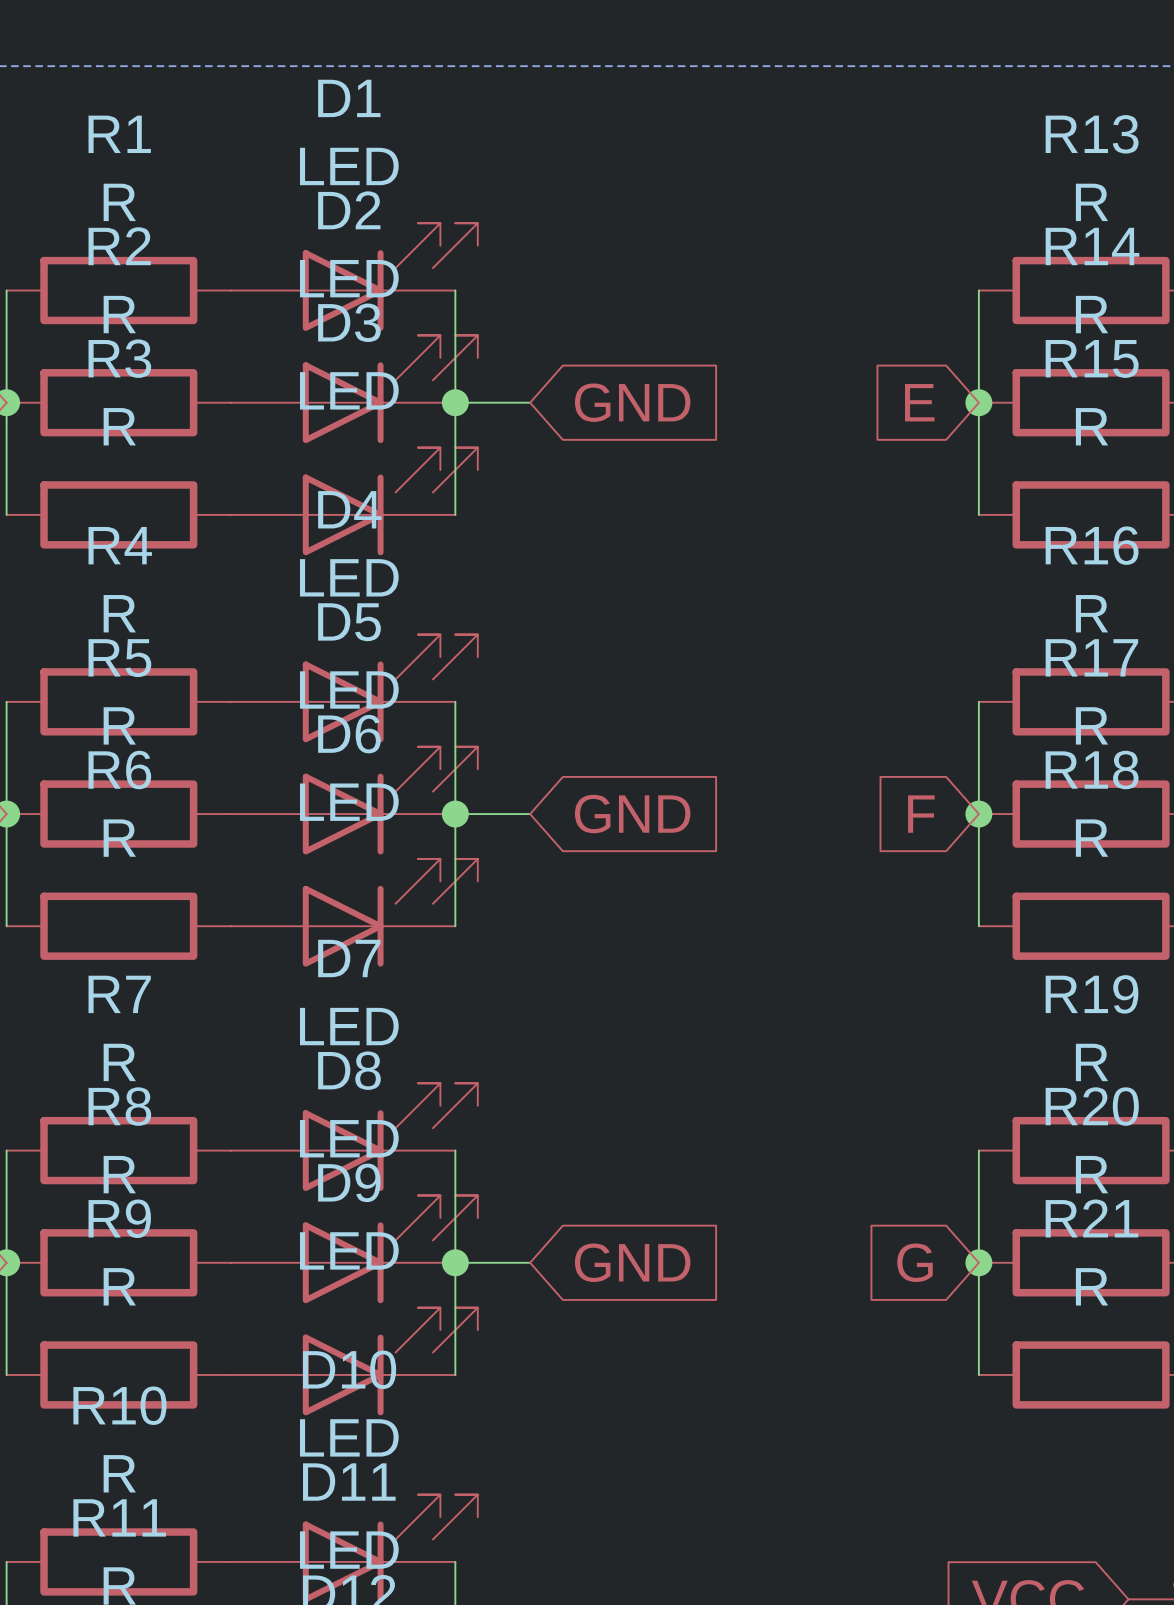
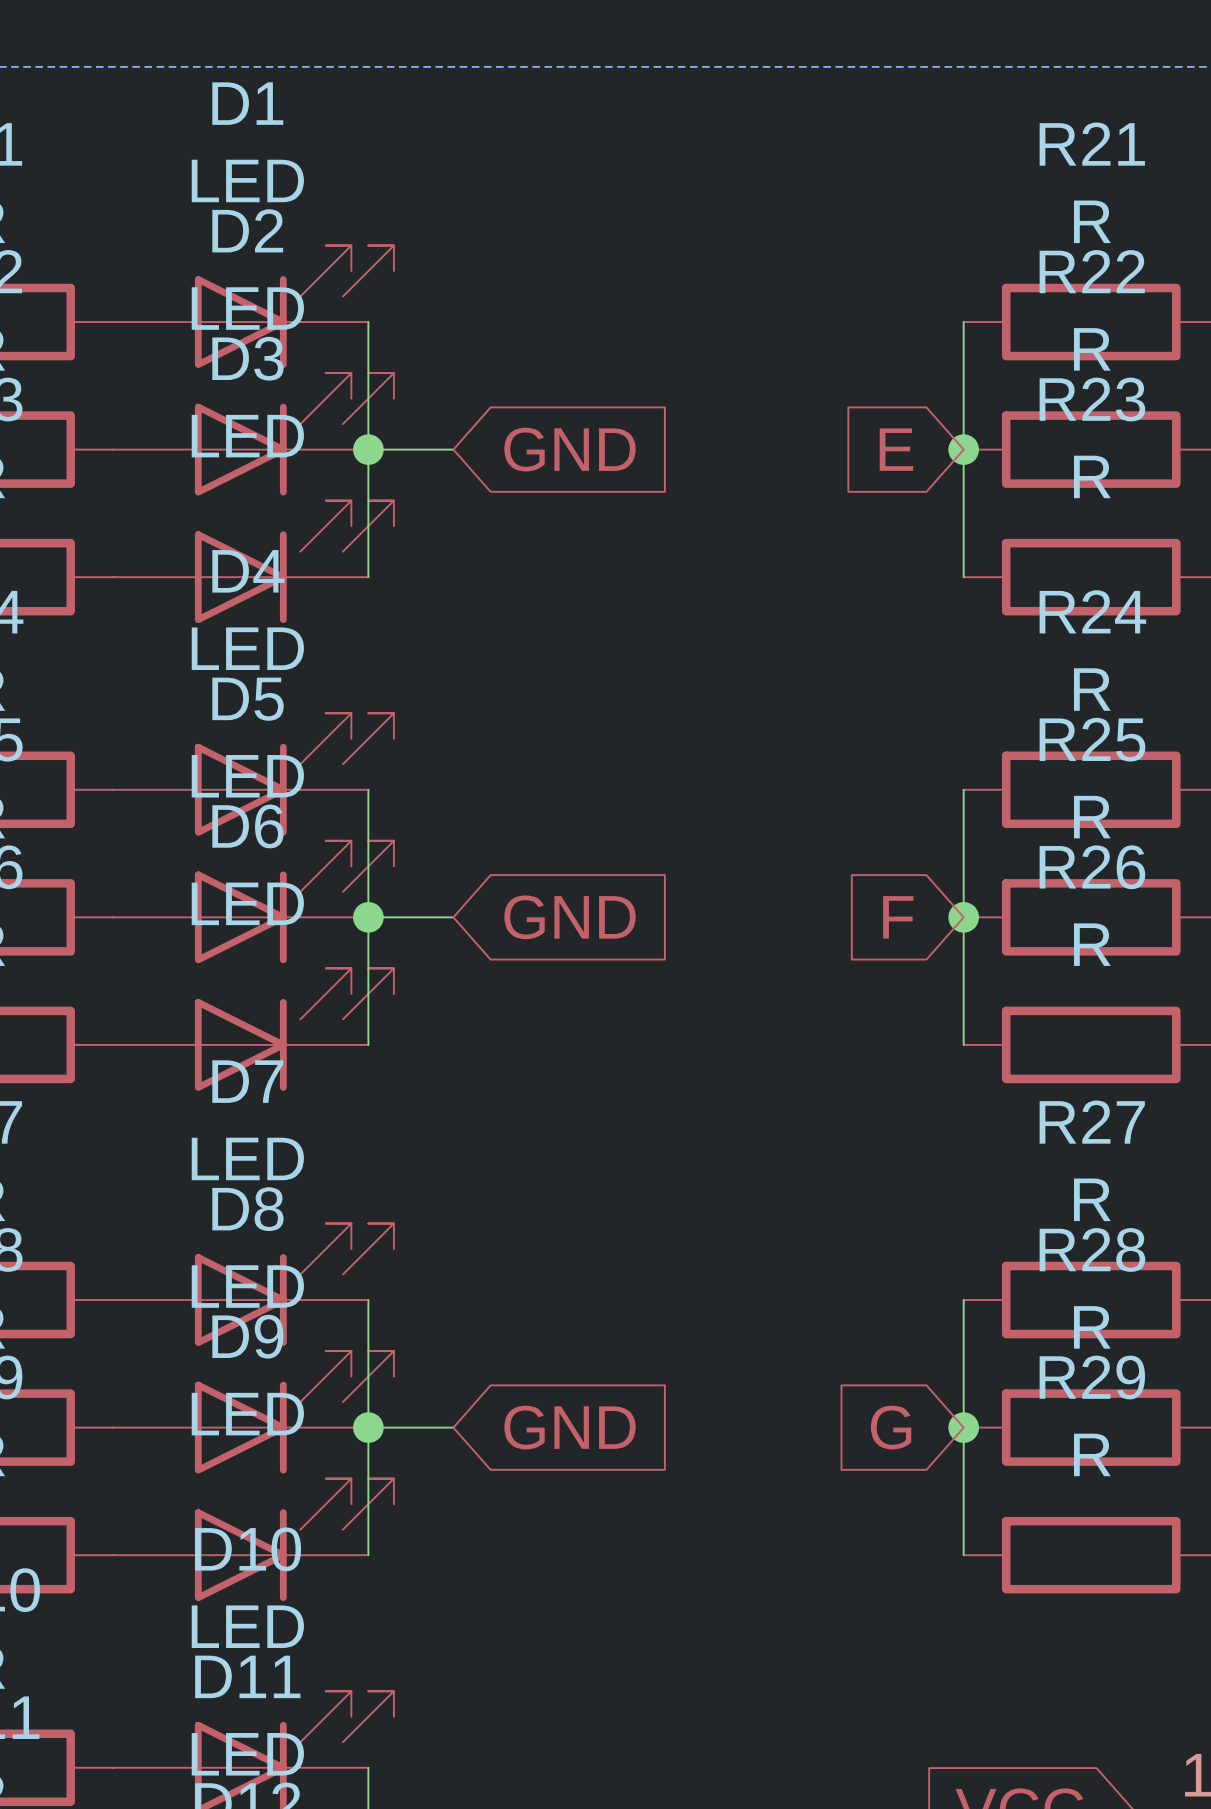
R13 name: R13 (1092, 134) -> R21 (1092, 144)
R14 name: R14 (1092, 246) -> R22 (1092, 271)
R15 name: R15 (1092, 358) -> R23 (1092, 399)
R16 name: R16 (1092, 545) -> R24 (1092, 611)
R17 name: R17 (1091, 657) -> R25 (1092, 739)
R18 name: R18 (1092, 770) -> R26 (1092, 867)
R19 name: R19 (1092, 994) -> R27 (1092, 1122)
R20 name: R20 (1092, 1106) -> R28 (1092, 1249)
R21 name: R21 (1091, 1218) -> R29 (1092, 1377)

